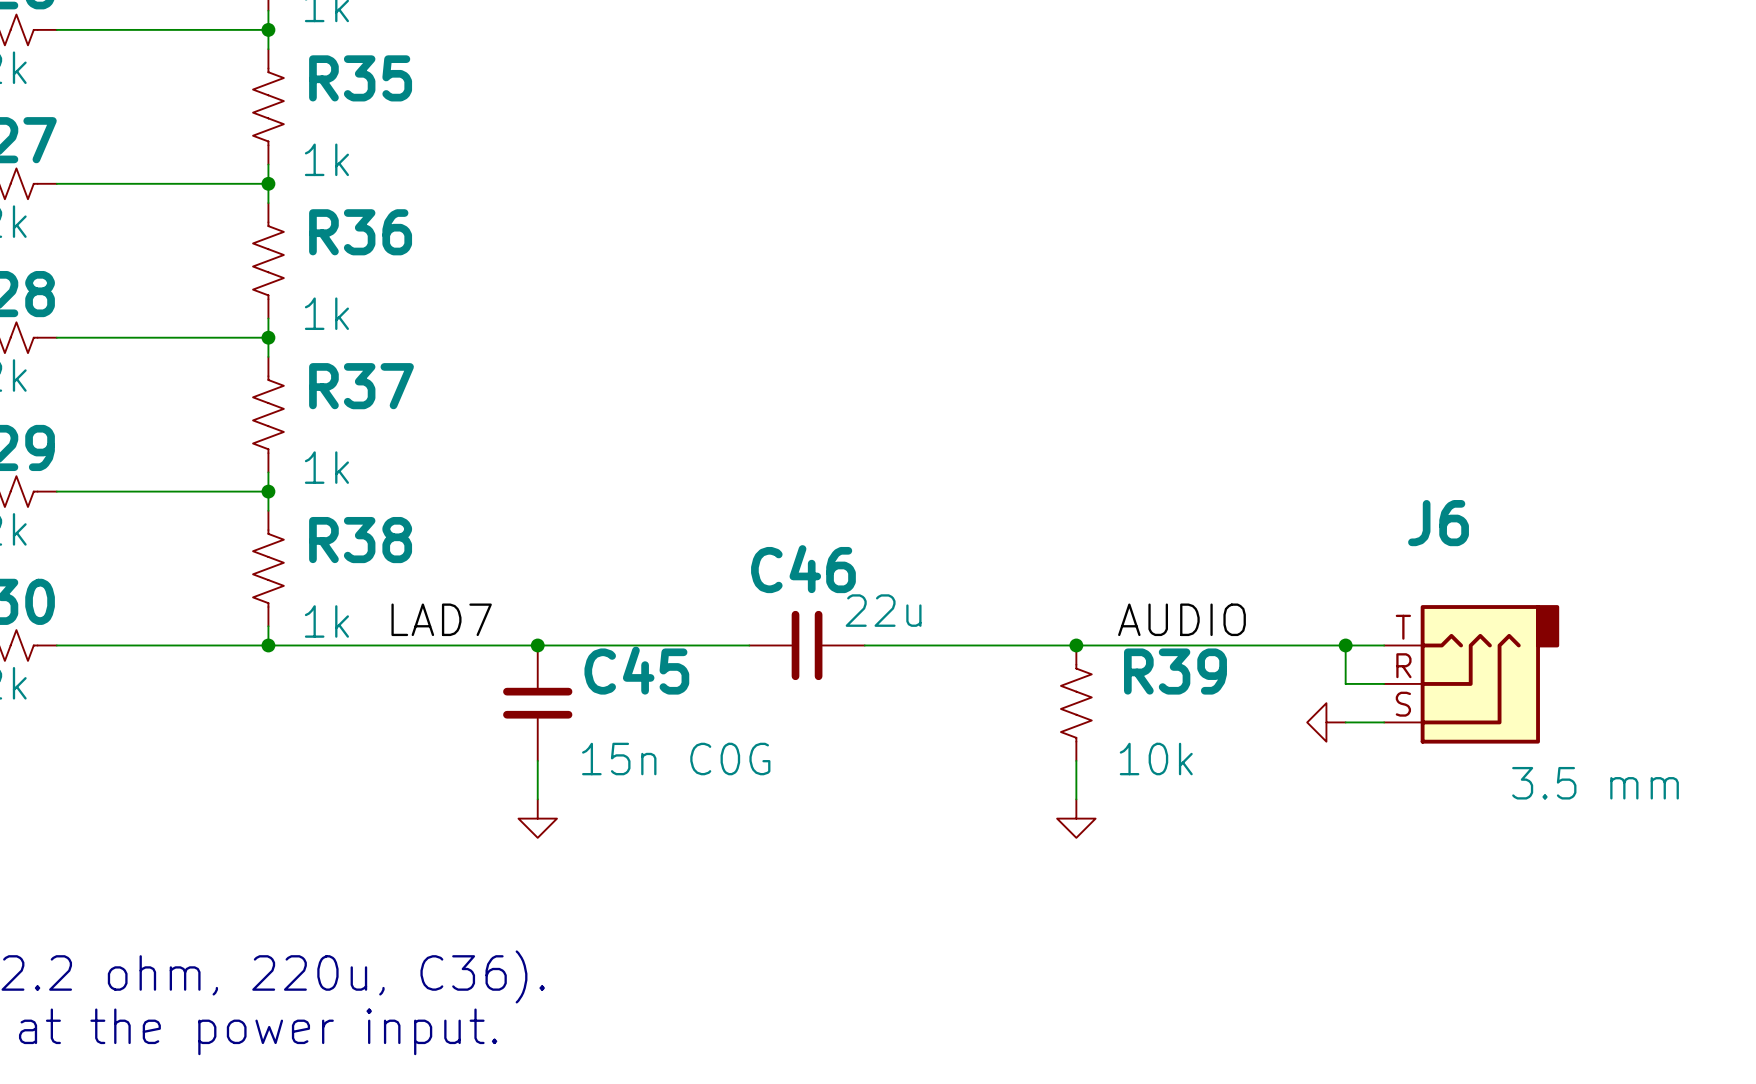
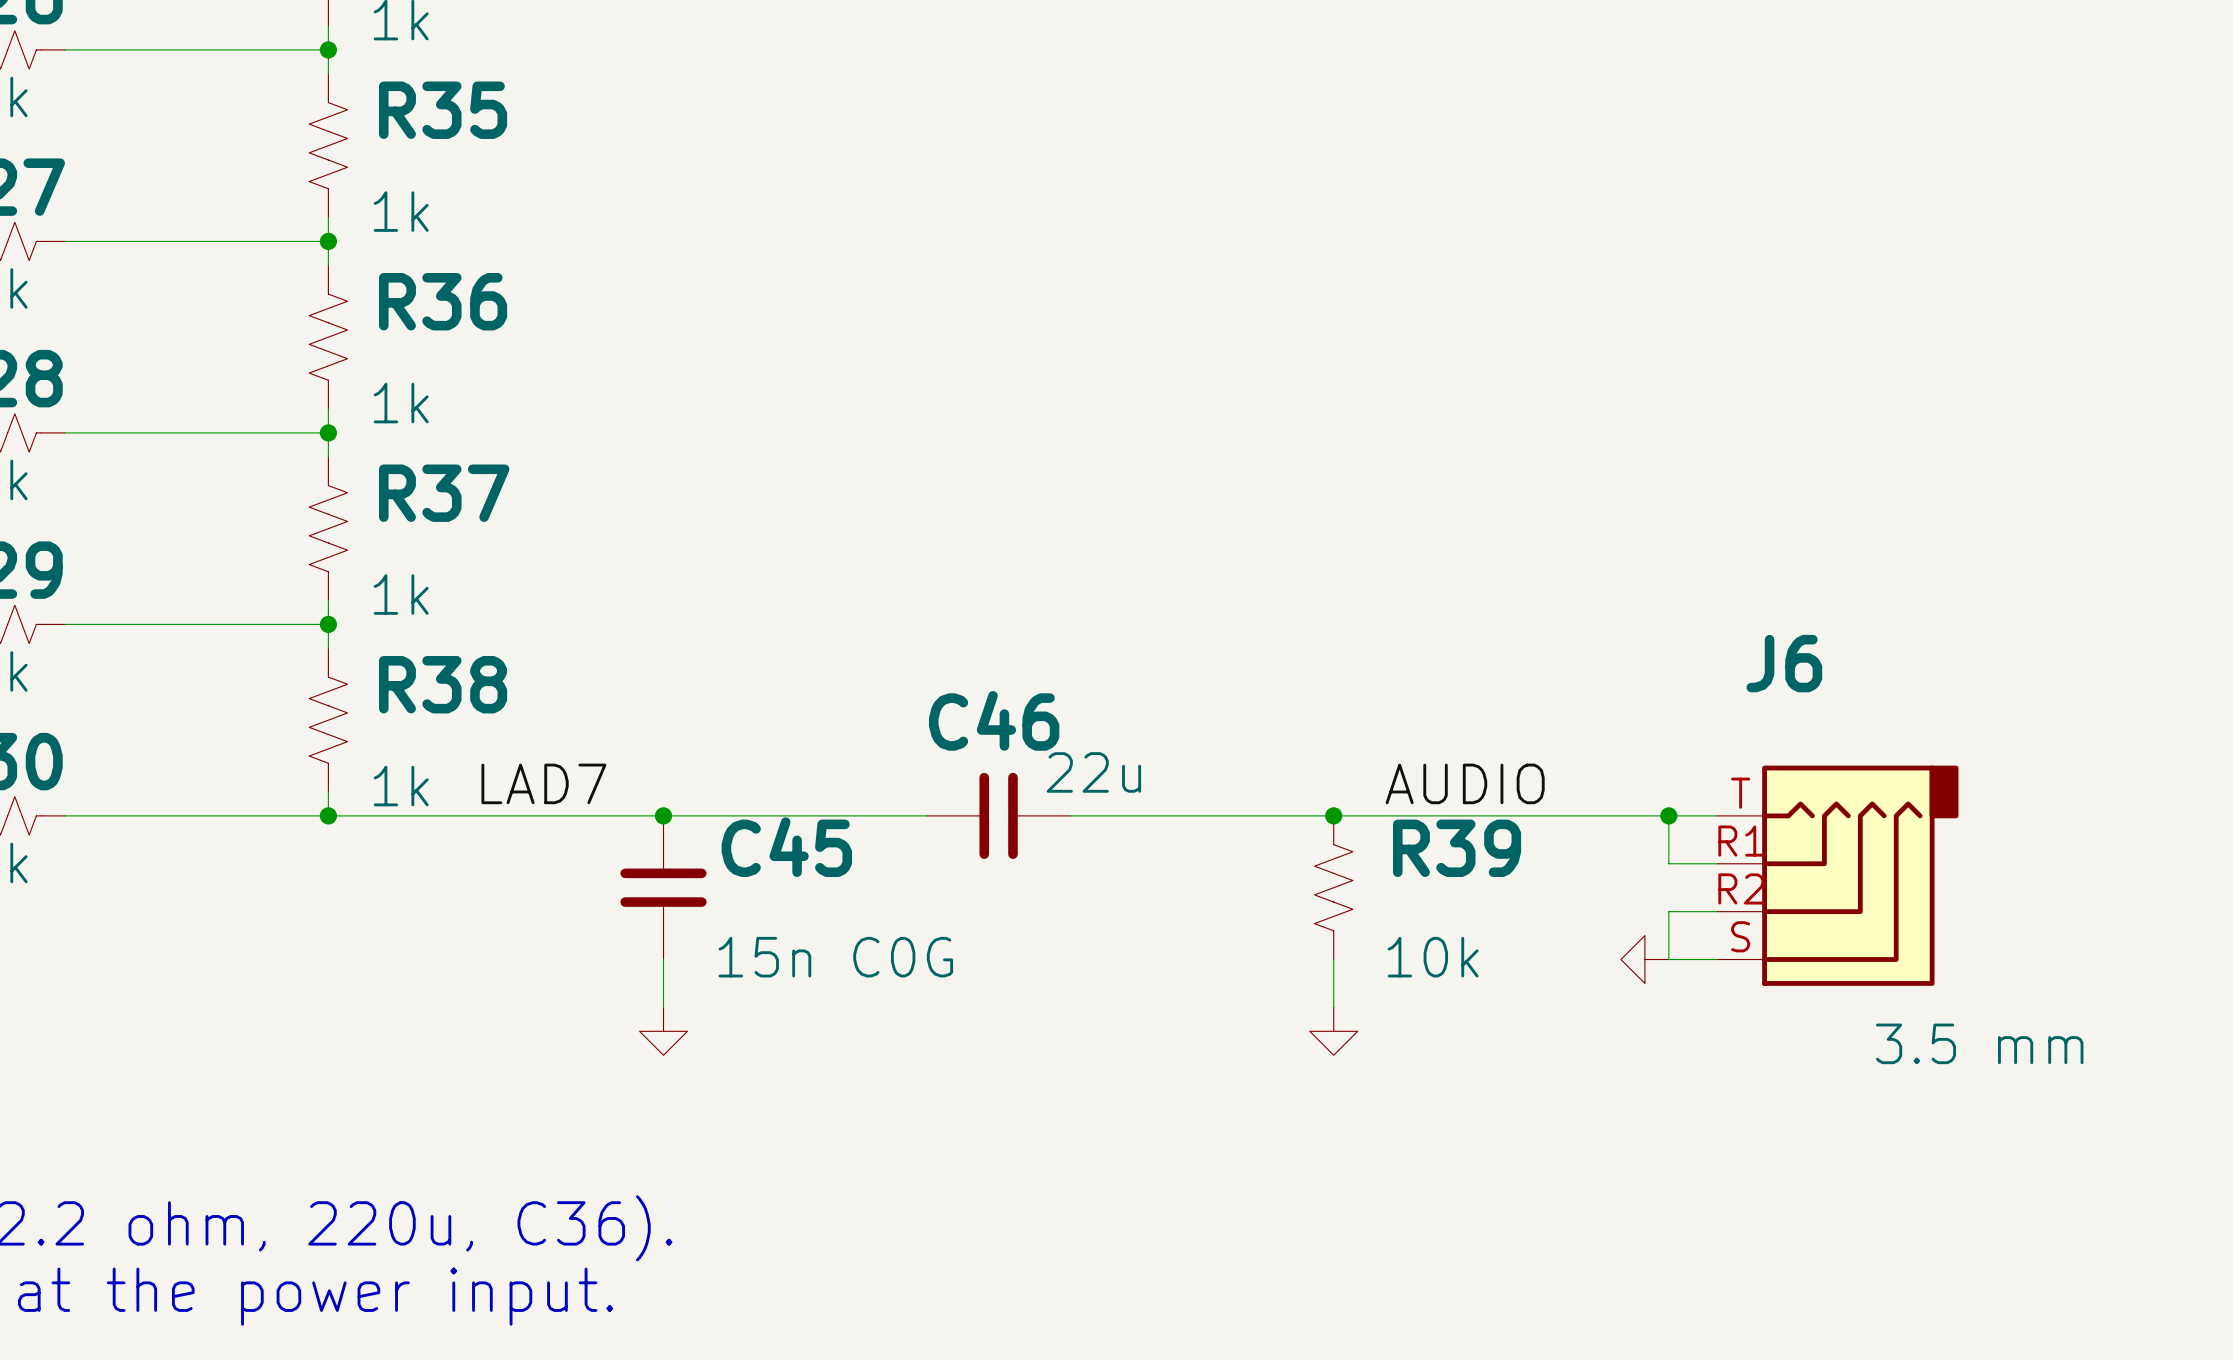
J6 symbol: [1384, 605, 1560, 744] -> [1716, 765, 1959, 986]
power symbol position: (1326, 722) -> (1644, 959)
wire: none -> (1668, 911) (1668, 959) (1716, 959)

